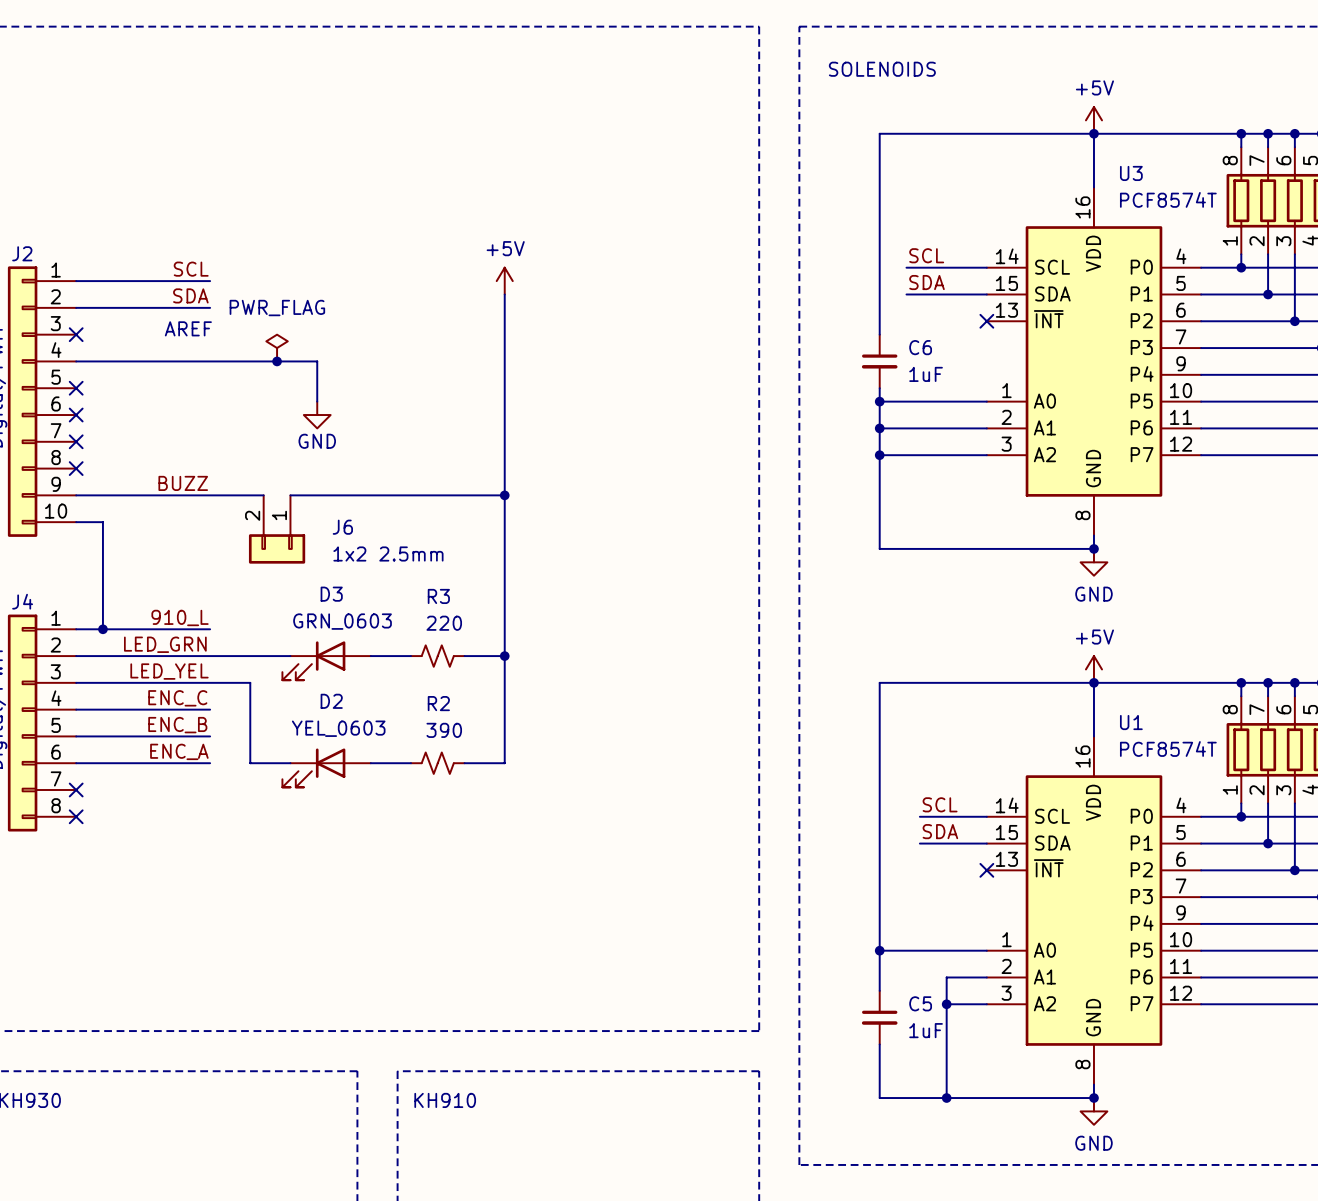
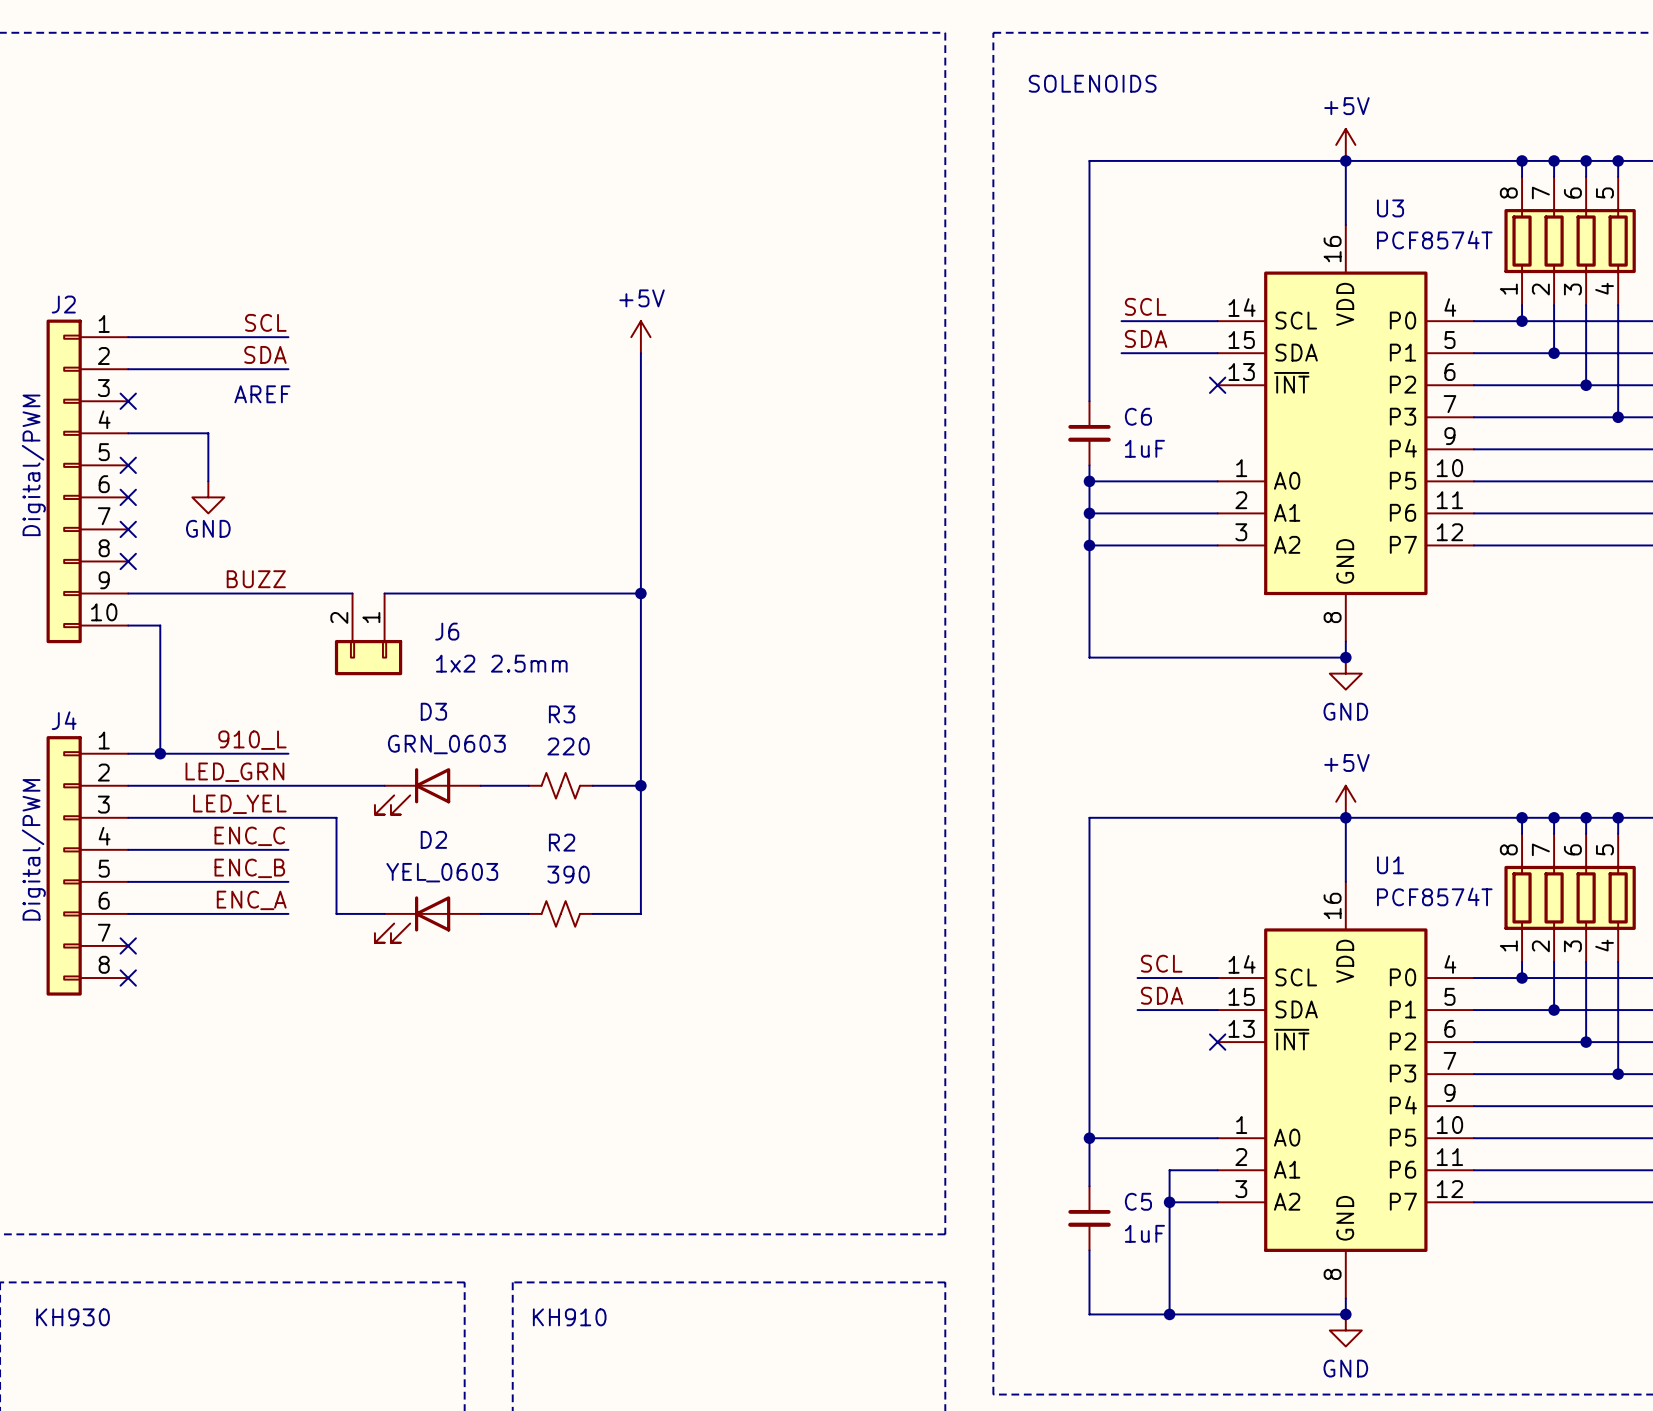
power symbol: PWR_FLAG (277, 348) -> none
wire: (143, 361) (317, 361) (317, 401) -> (208, 433) (208, 481)
junction: (277, 361) -> none
power symbol position: GND (317, 415) -> GND (208, 497)

